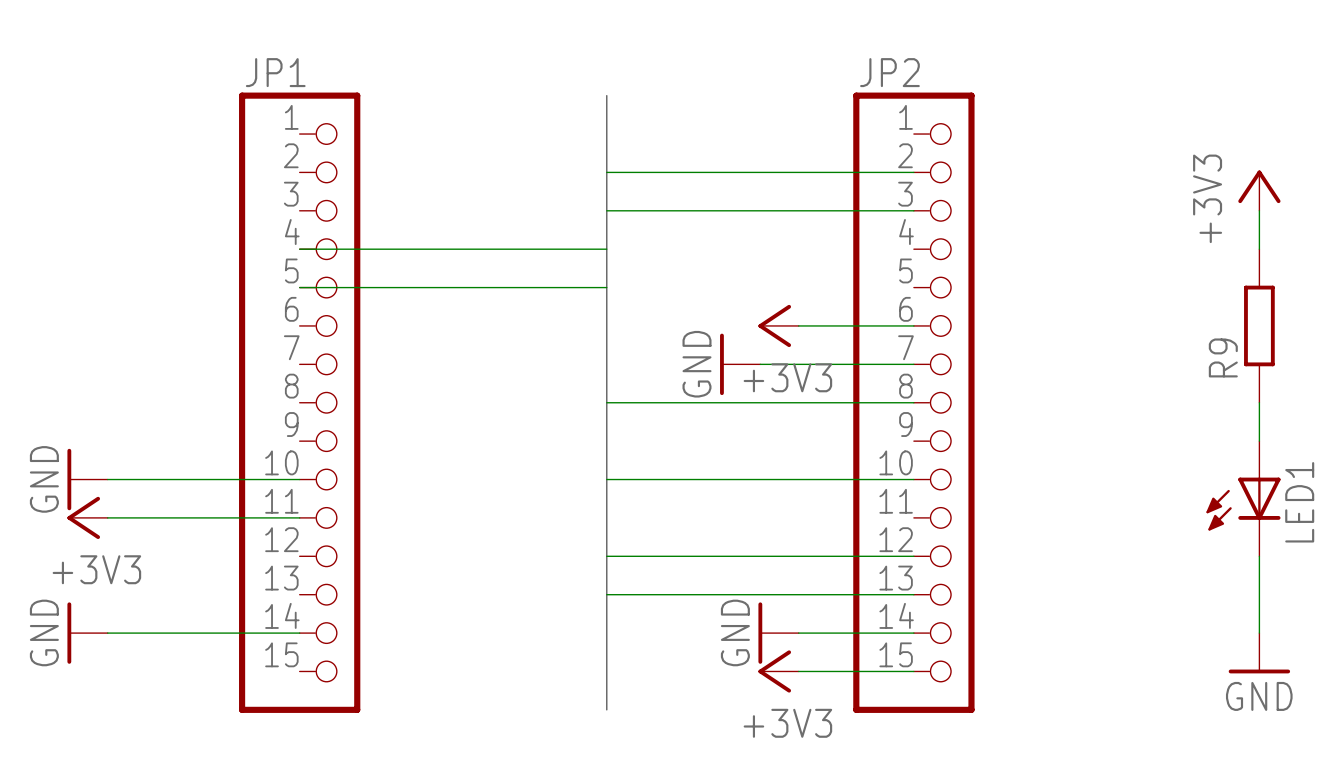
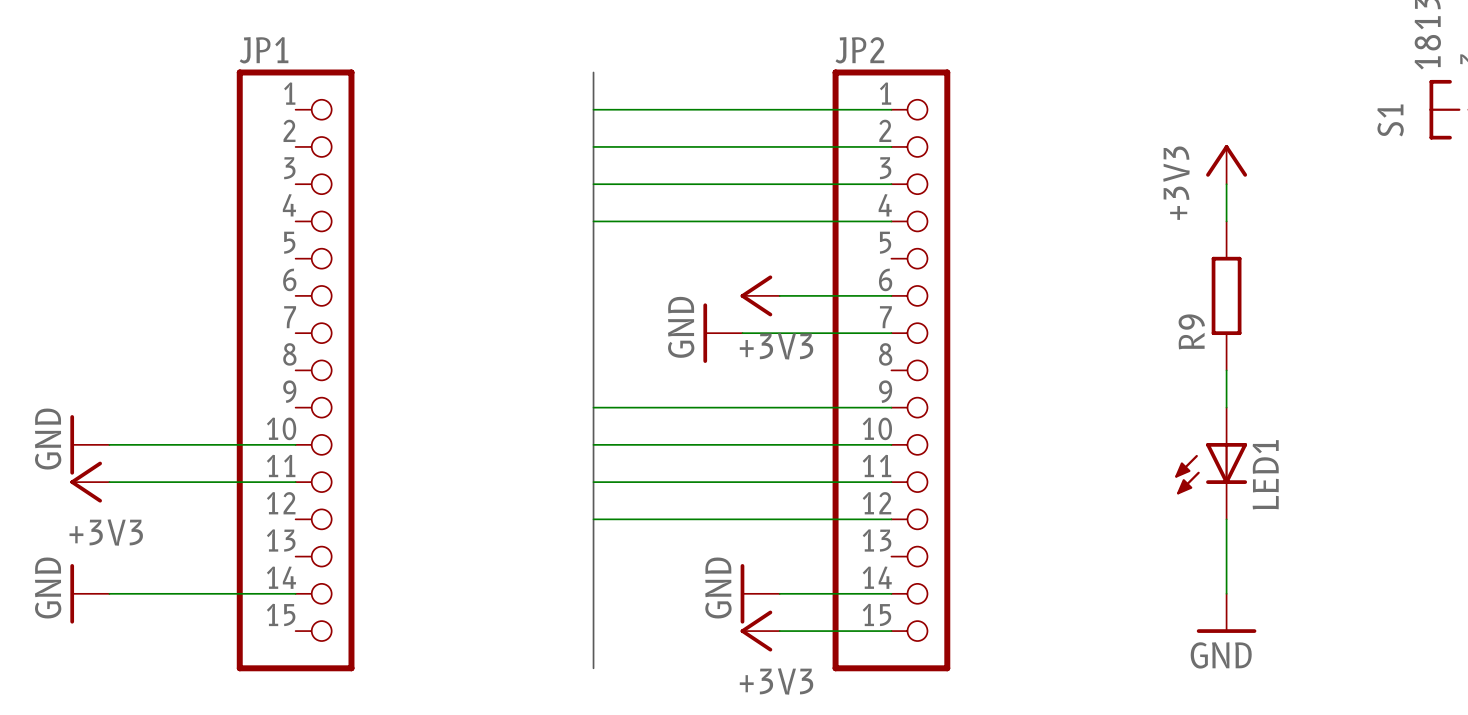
wire: (299, 249) (606, 249) -> (891, 221) (593, 221)
wire: (299, 287) (606, 287) -> (593, 109) (891, 109)
wire: (606, 402) (913, 402) -> (593, 482) (891, 482)
wire: (606, 594) (913, 594) -> (593, 407) (891, 407)

